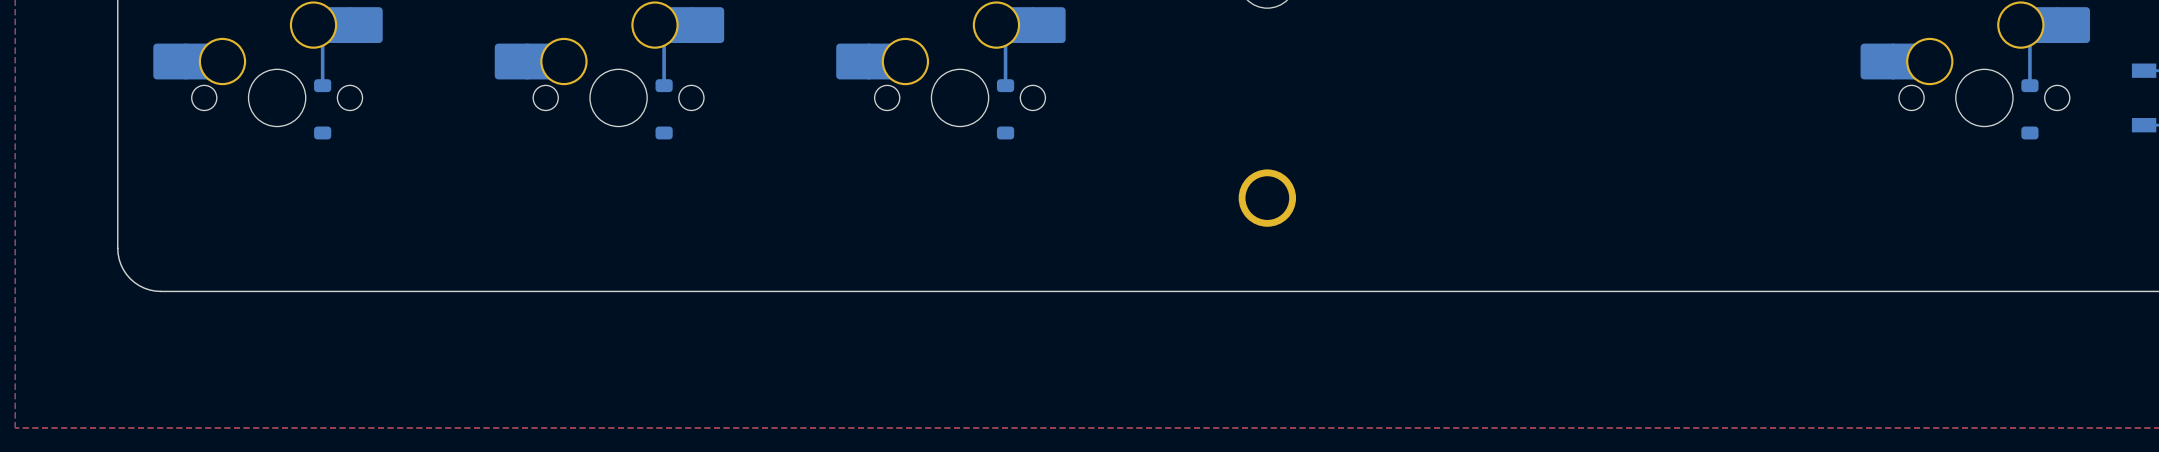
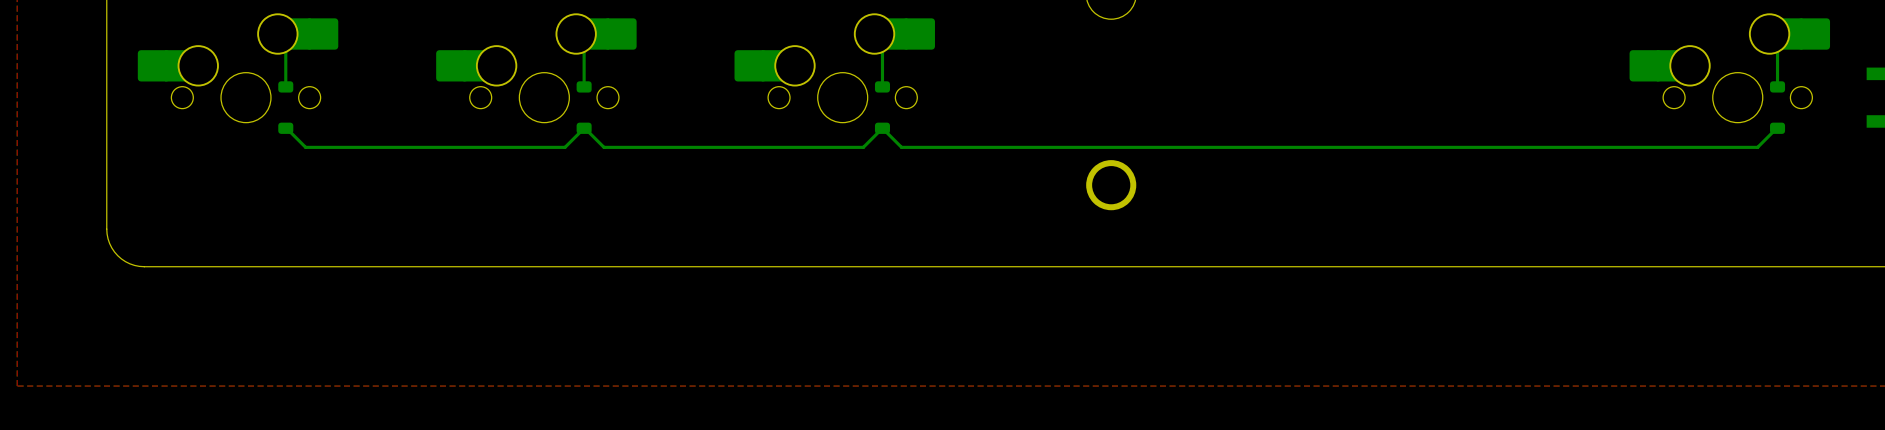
bottom track: none -> (285, 128) (305, 147) (565, 147) (584, 128) (604, 147) (863, 147) (882, 128) (901, 147) (1757, 147) (1777, 128)

